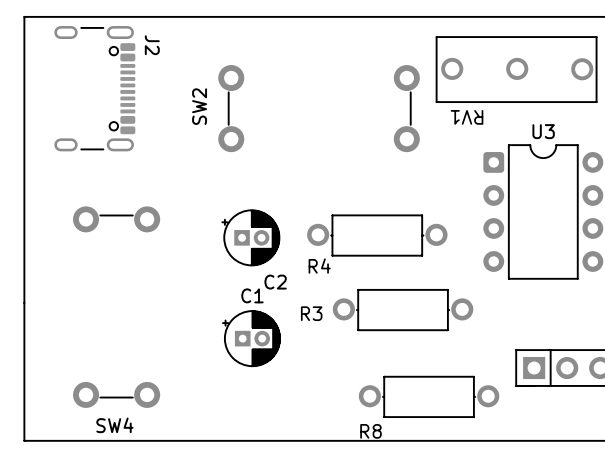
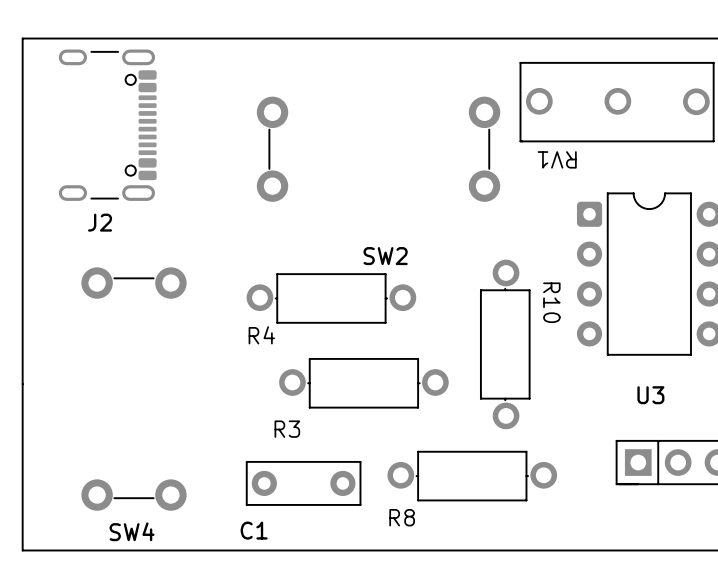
J2 name rotation: 0° (152, 45) -> 90° counterclockwise (100, 222)
J2 name position: J2 (152, 45) -> J2 (100, 222)
SW2 name rotation: 0° (199, 106) -> 90° clockwise (385, 256)
SW2 name position: SW2 (199, 106) -> SW2 (385, 256)
U3 name position: U3 (543, 131) -> U3 (650, 395)
R4 position: (377, 235) -> (331, 298)
C2: (250, 237) -> none
R10: none -> (505, 344)
C1 name position: C1 (252, 295) -> C1 (254, 530)
C1 footprint: [222, 310, 281, 367] -> [245, 460, 362, 506]
R3 position: (403, 310) -> (363, 383)
R3 name position: R3 (311, 313) -> R3 (287, 429)
R8 position: (429, 396) -> (472, 476)

